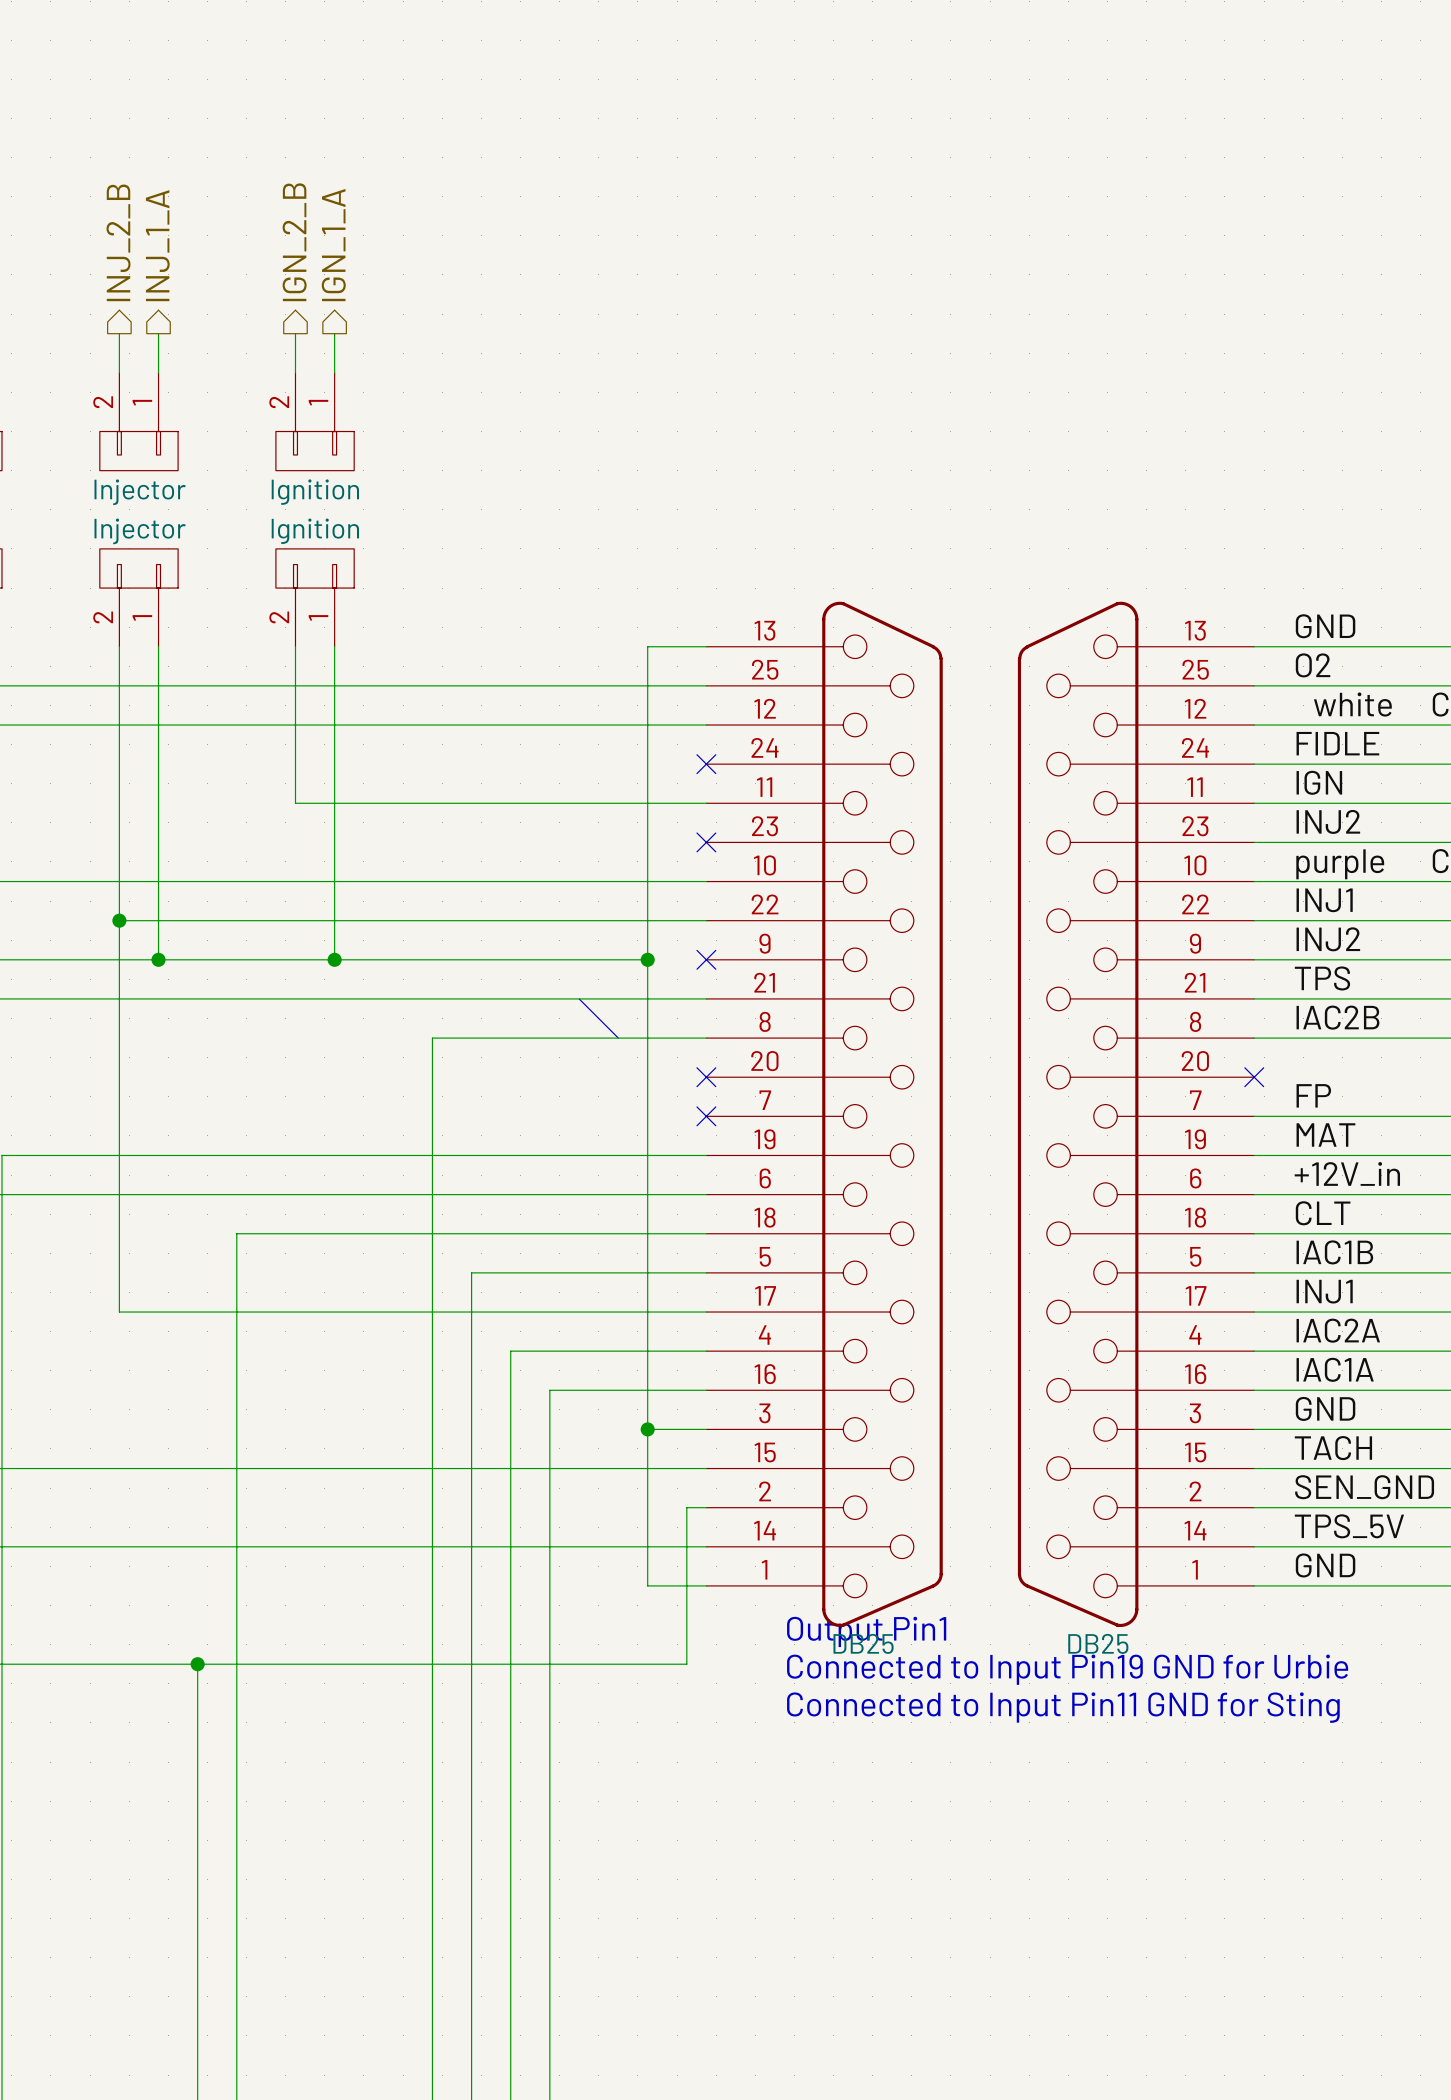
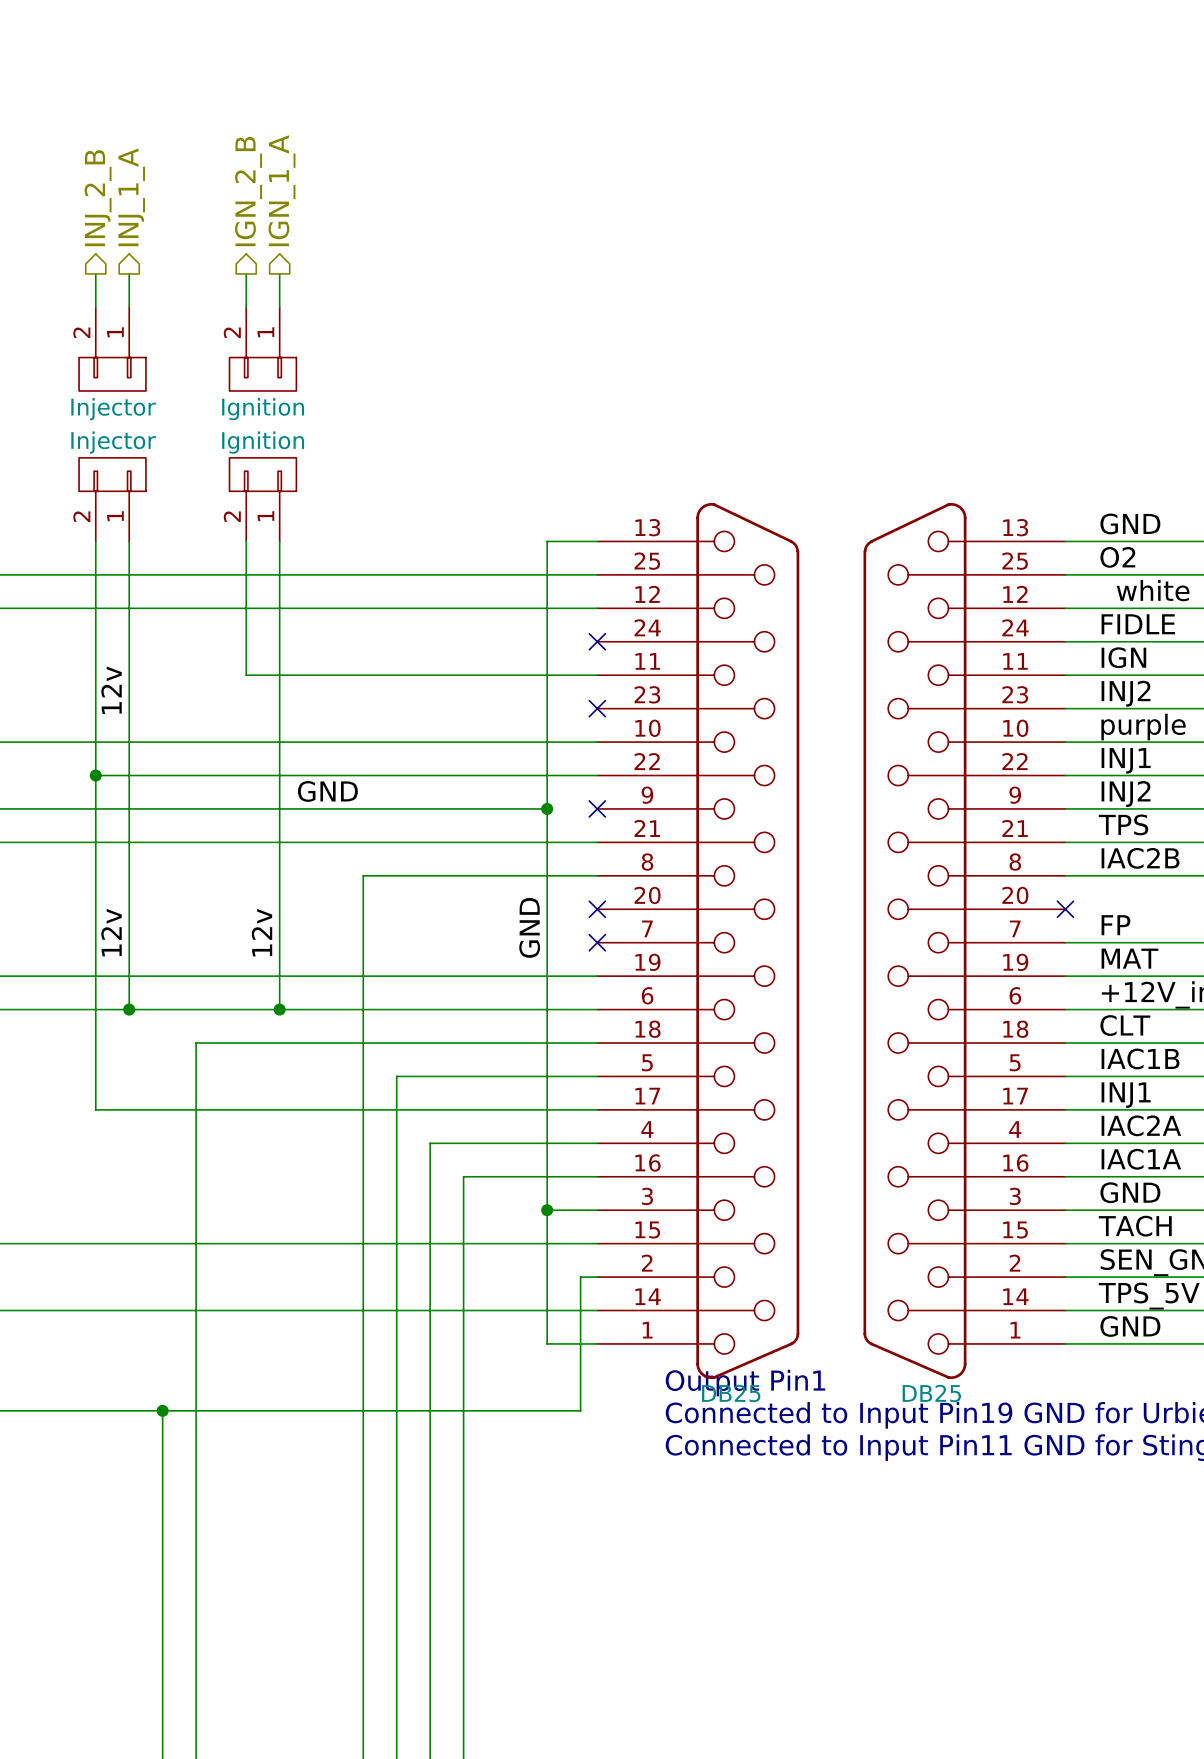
label: none -> 12v (111, 690)
label: none -> GND (327, 791)
wire: none -> (129, 808) (129, 1009)
junction: (158, 959) -> none
wire: none -> (279, 808) (279, 1009)
junction: (334, 959) -> none
bus: (579, 998) (618, 1038) -> none
label: none -> GND (529, 927)
label: none -> 12v (111, 932)
label: none -> 12v (261, 932)
junction: none -> (129, 1009)
junction: none -> (279, 1009)

